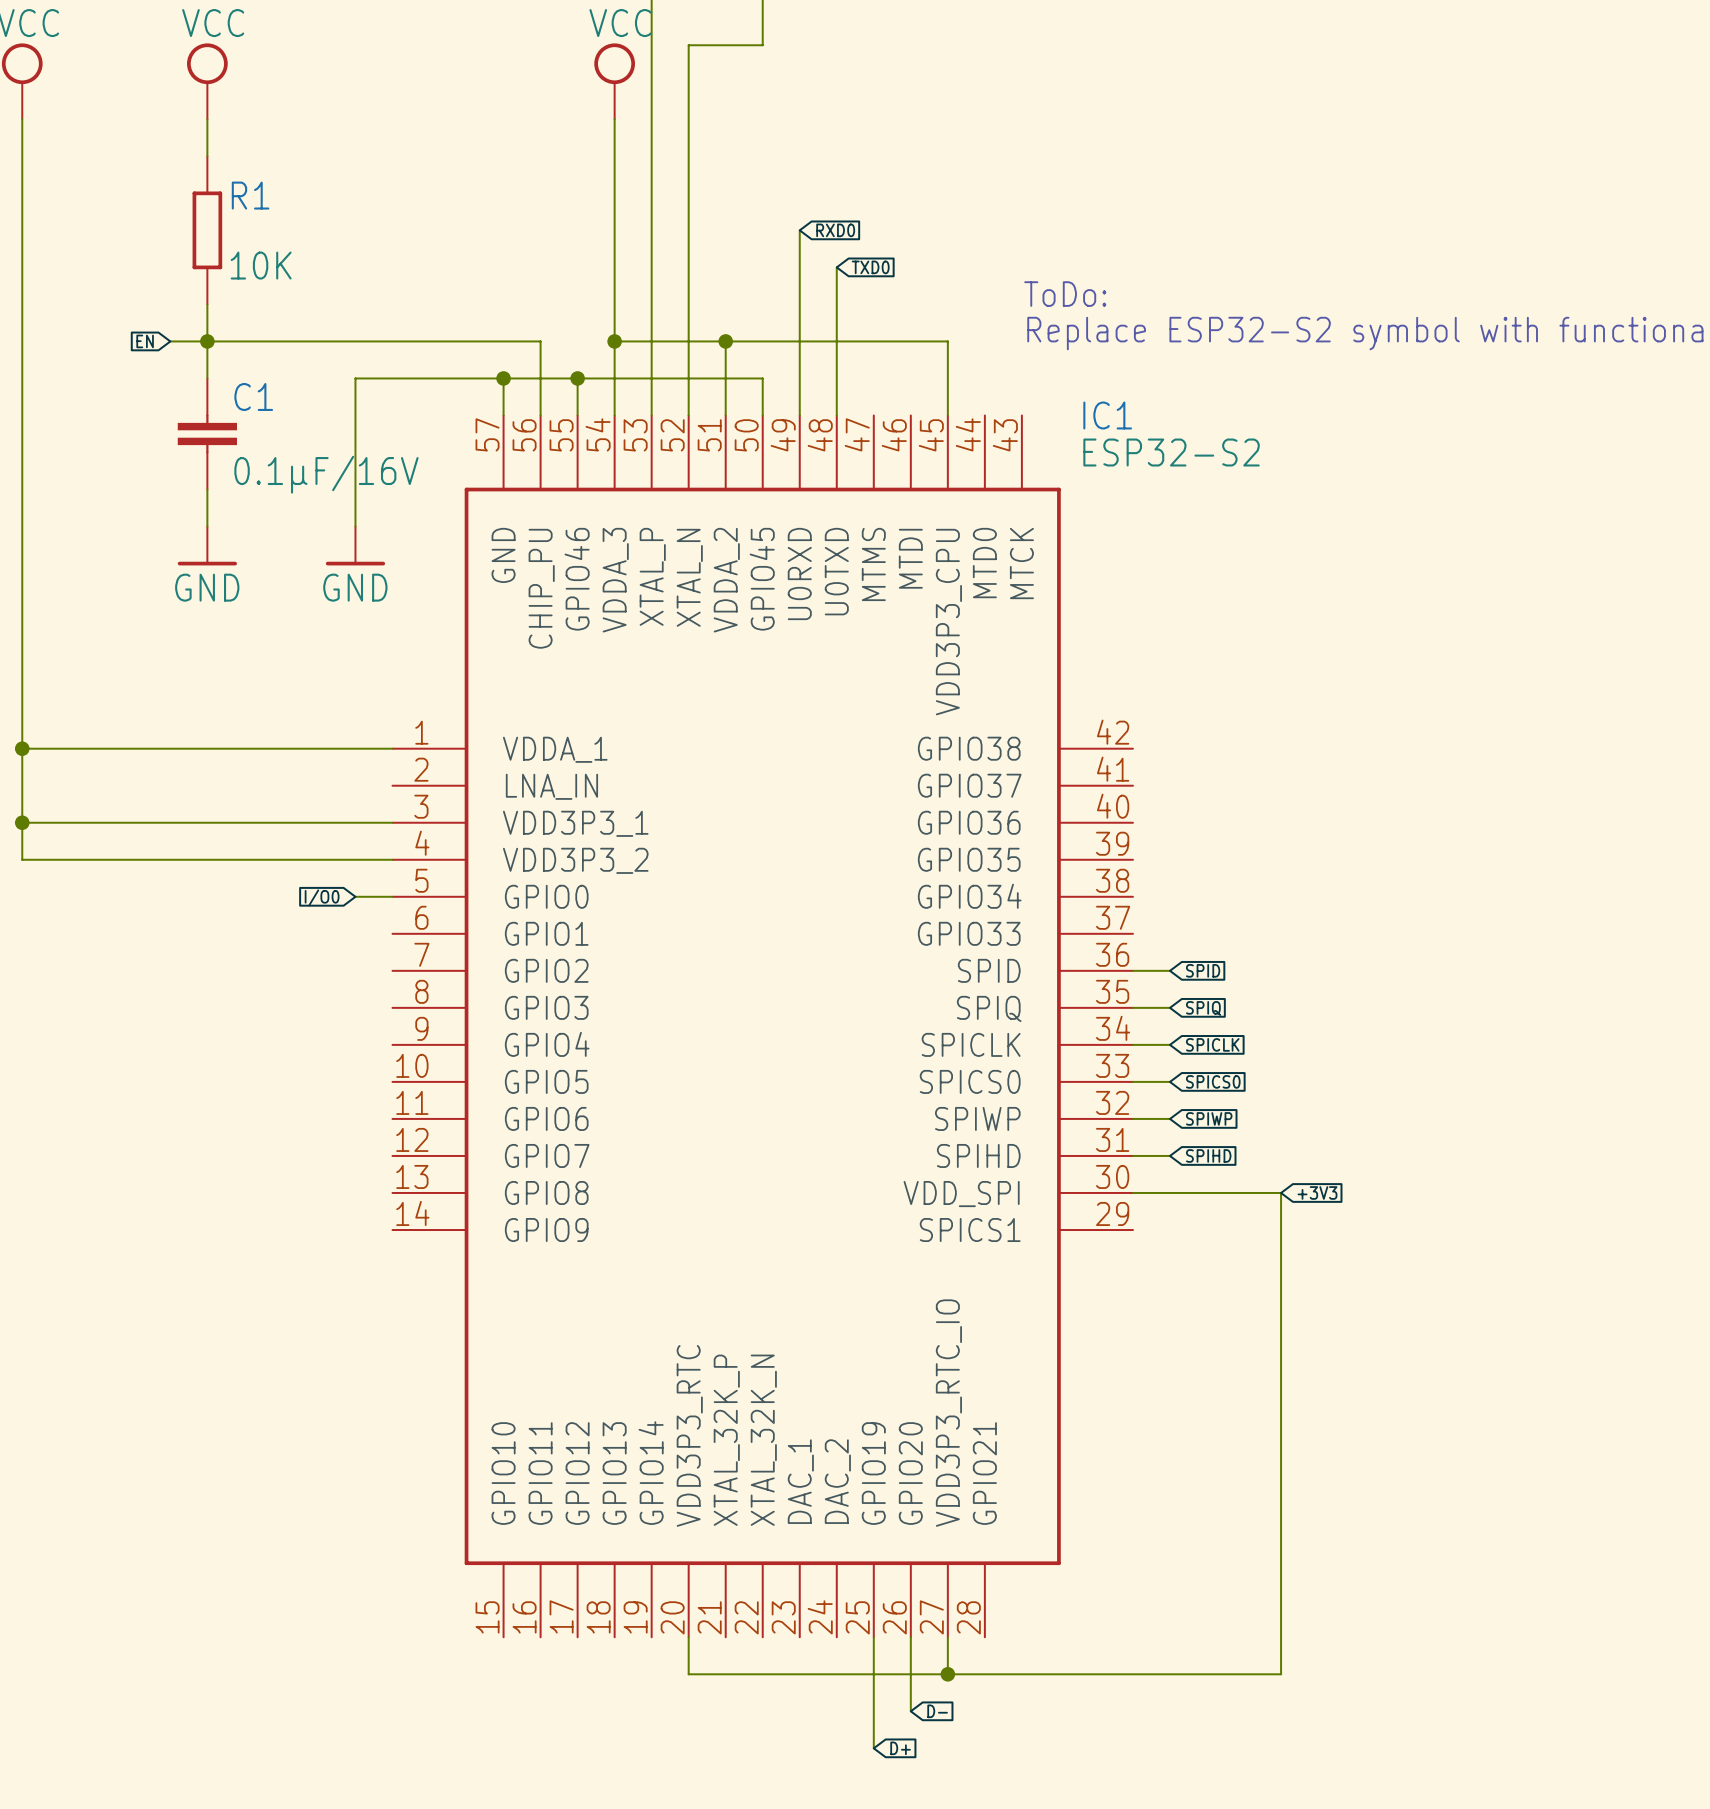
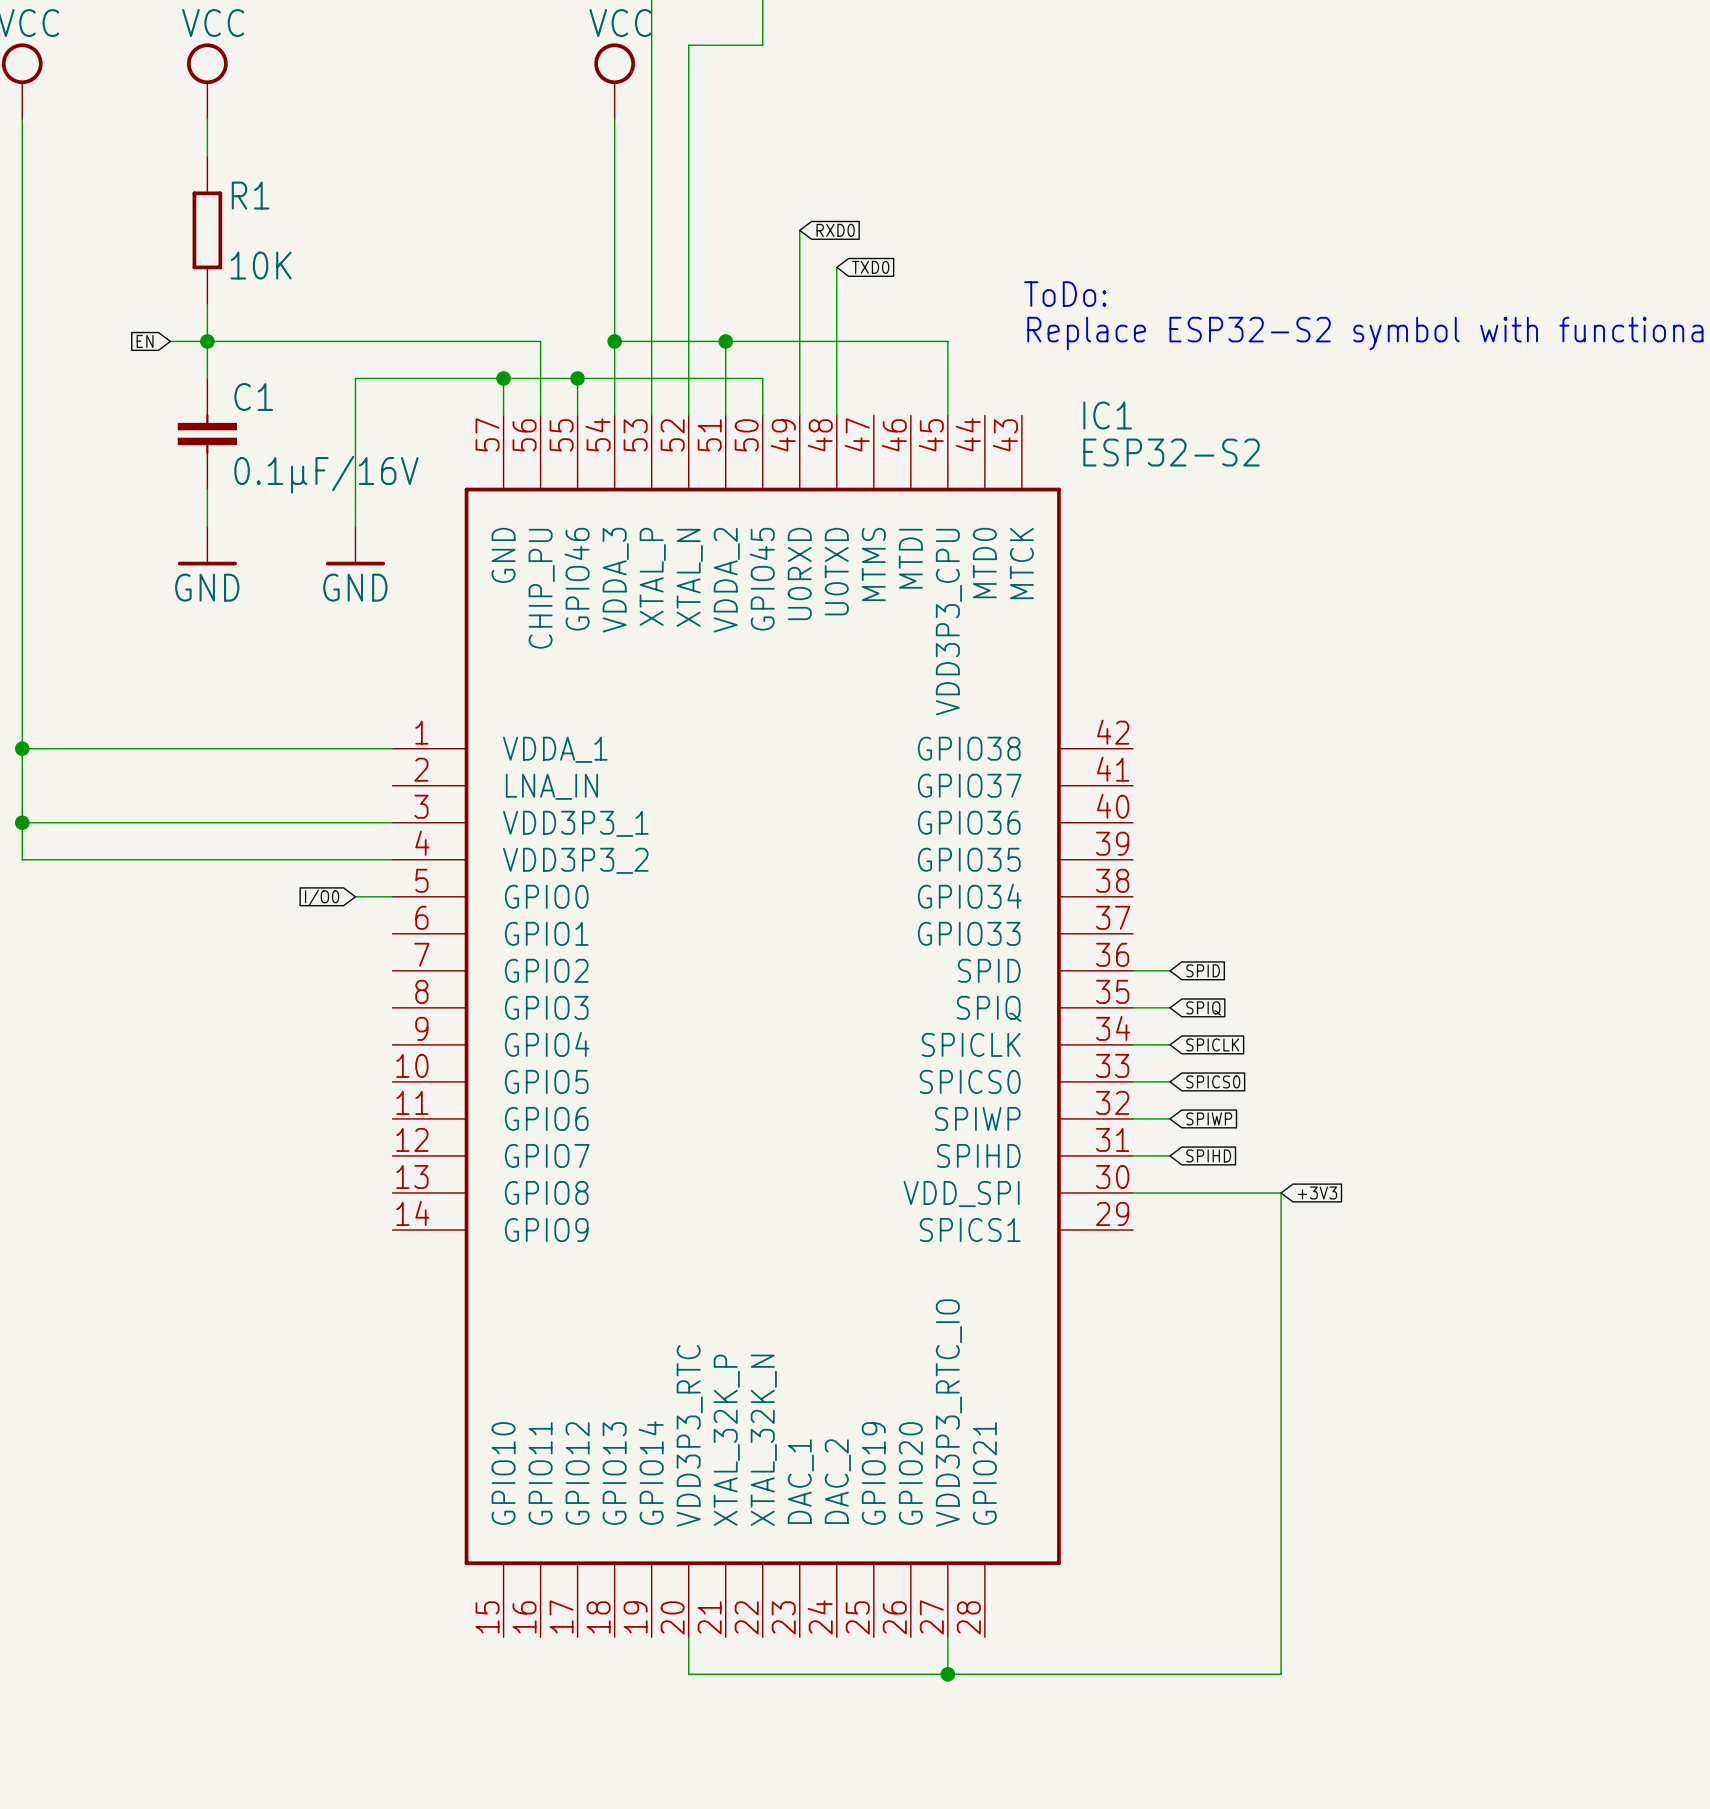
wire: (873, 1637) (873, 1748) -> none
wire: (910, 1637) (910, 1711) -> none
global label: D- (937, 1711) -> none
global label: D+ (900, 1748) -> none

